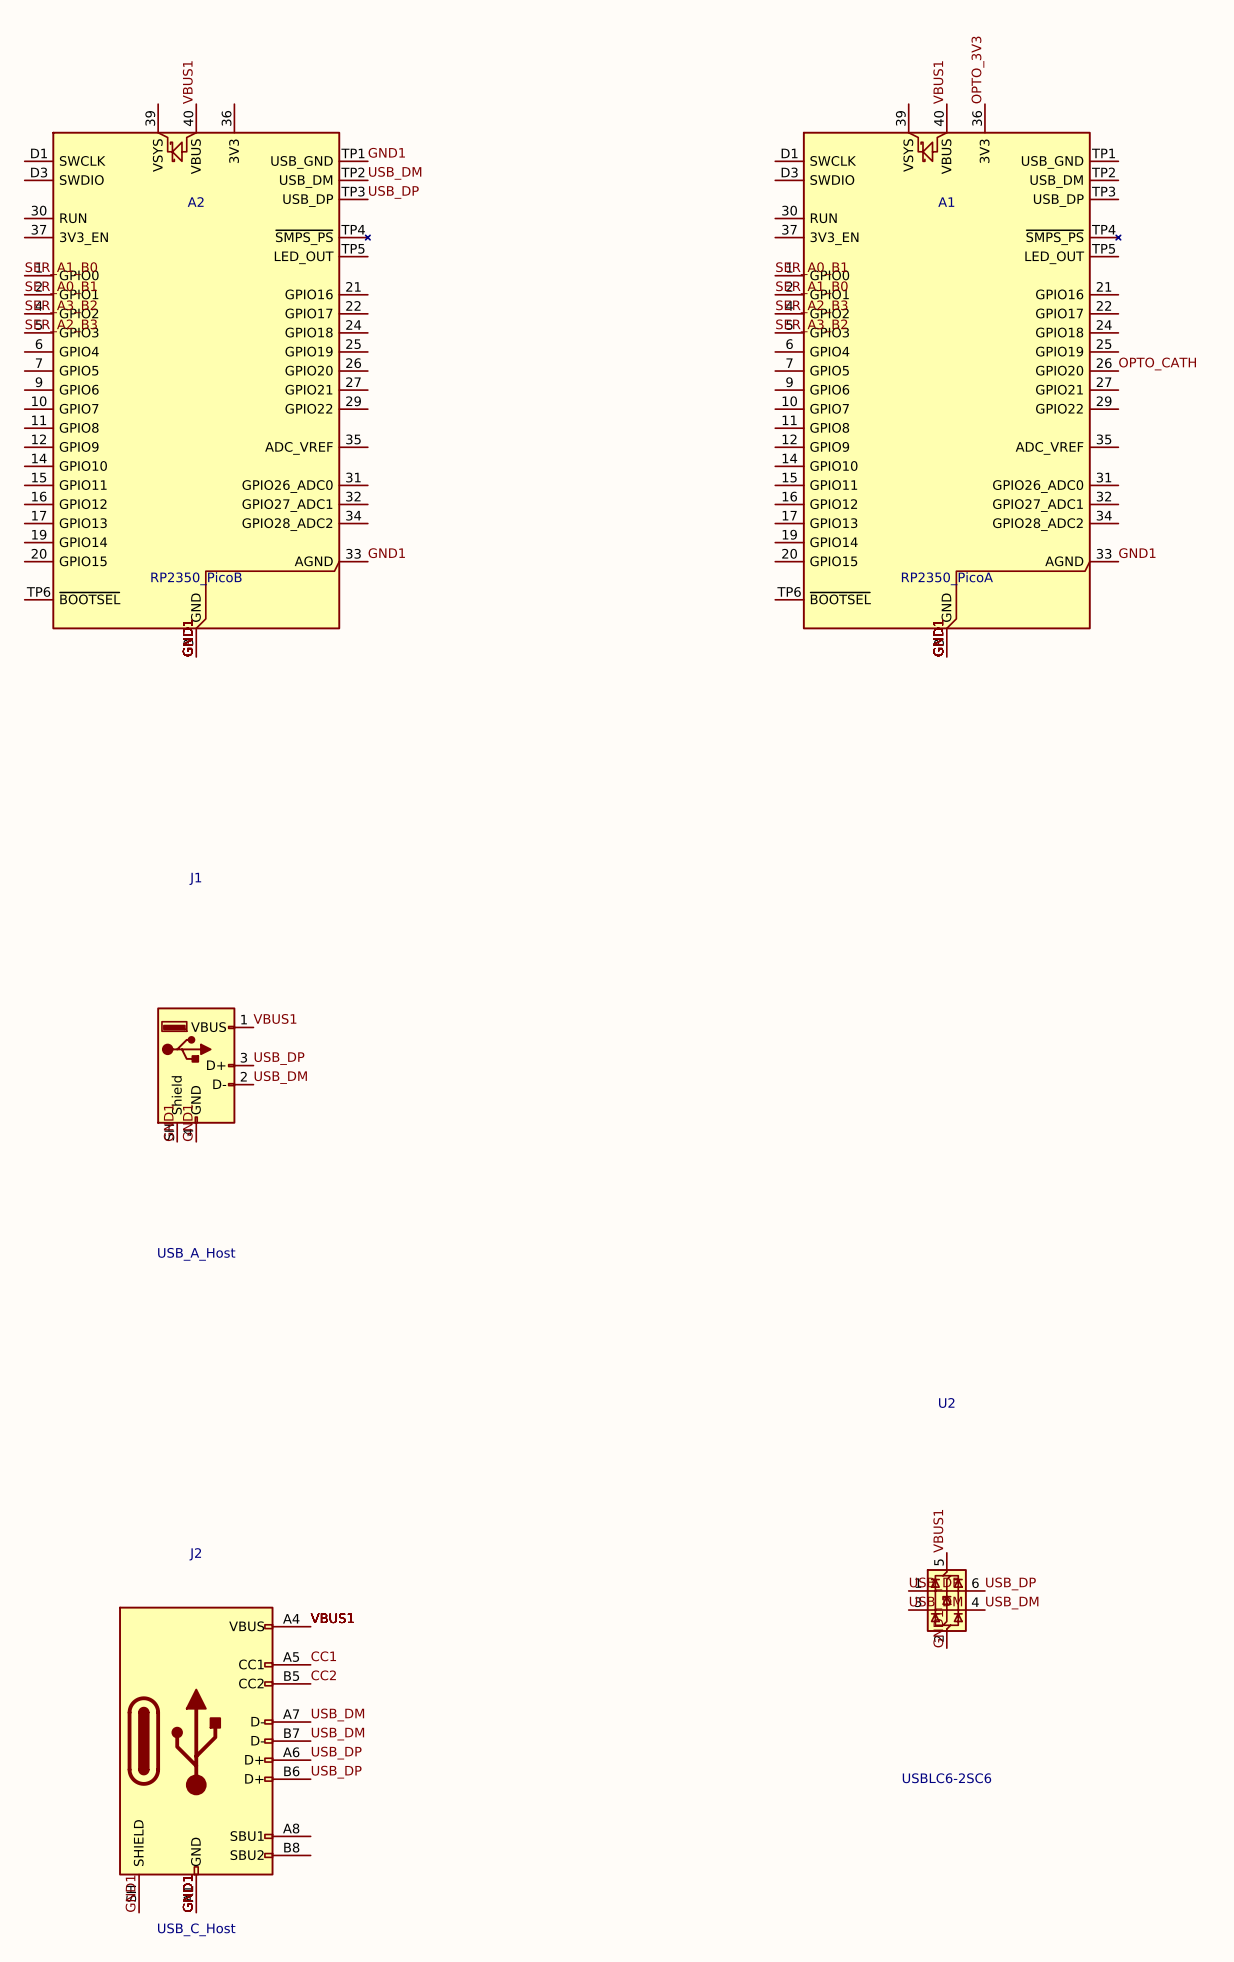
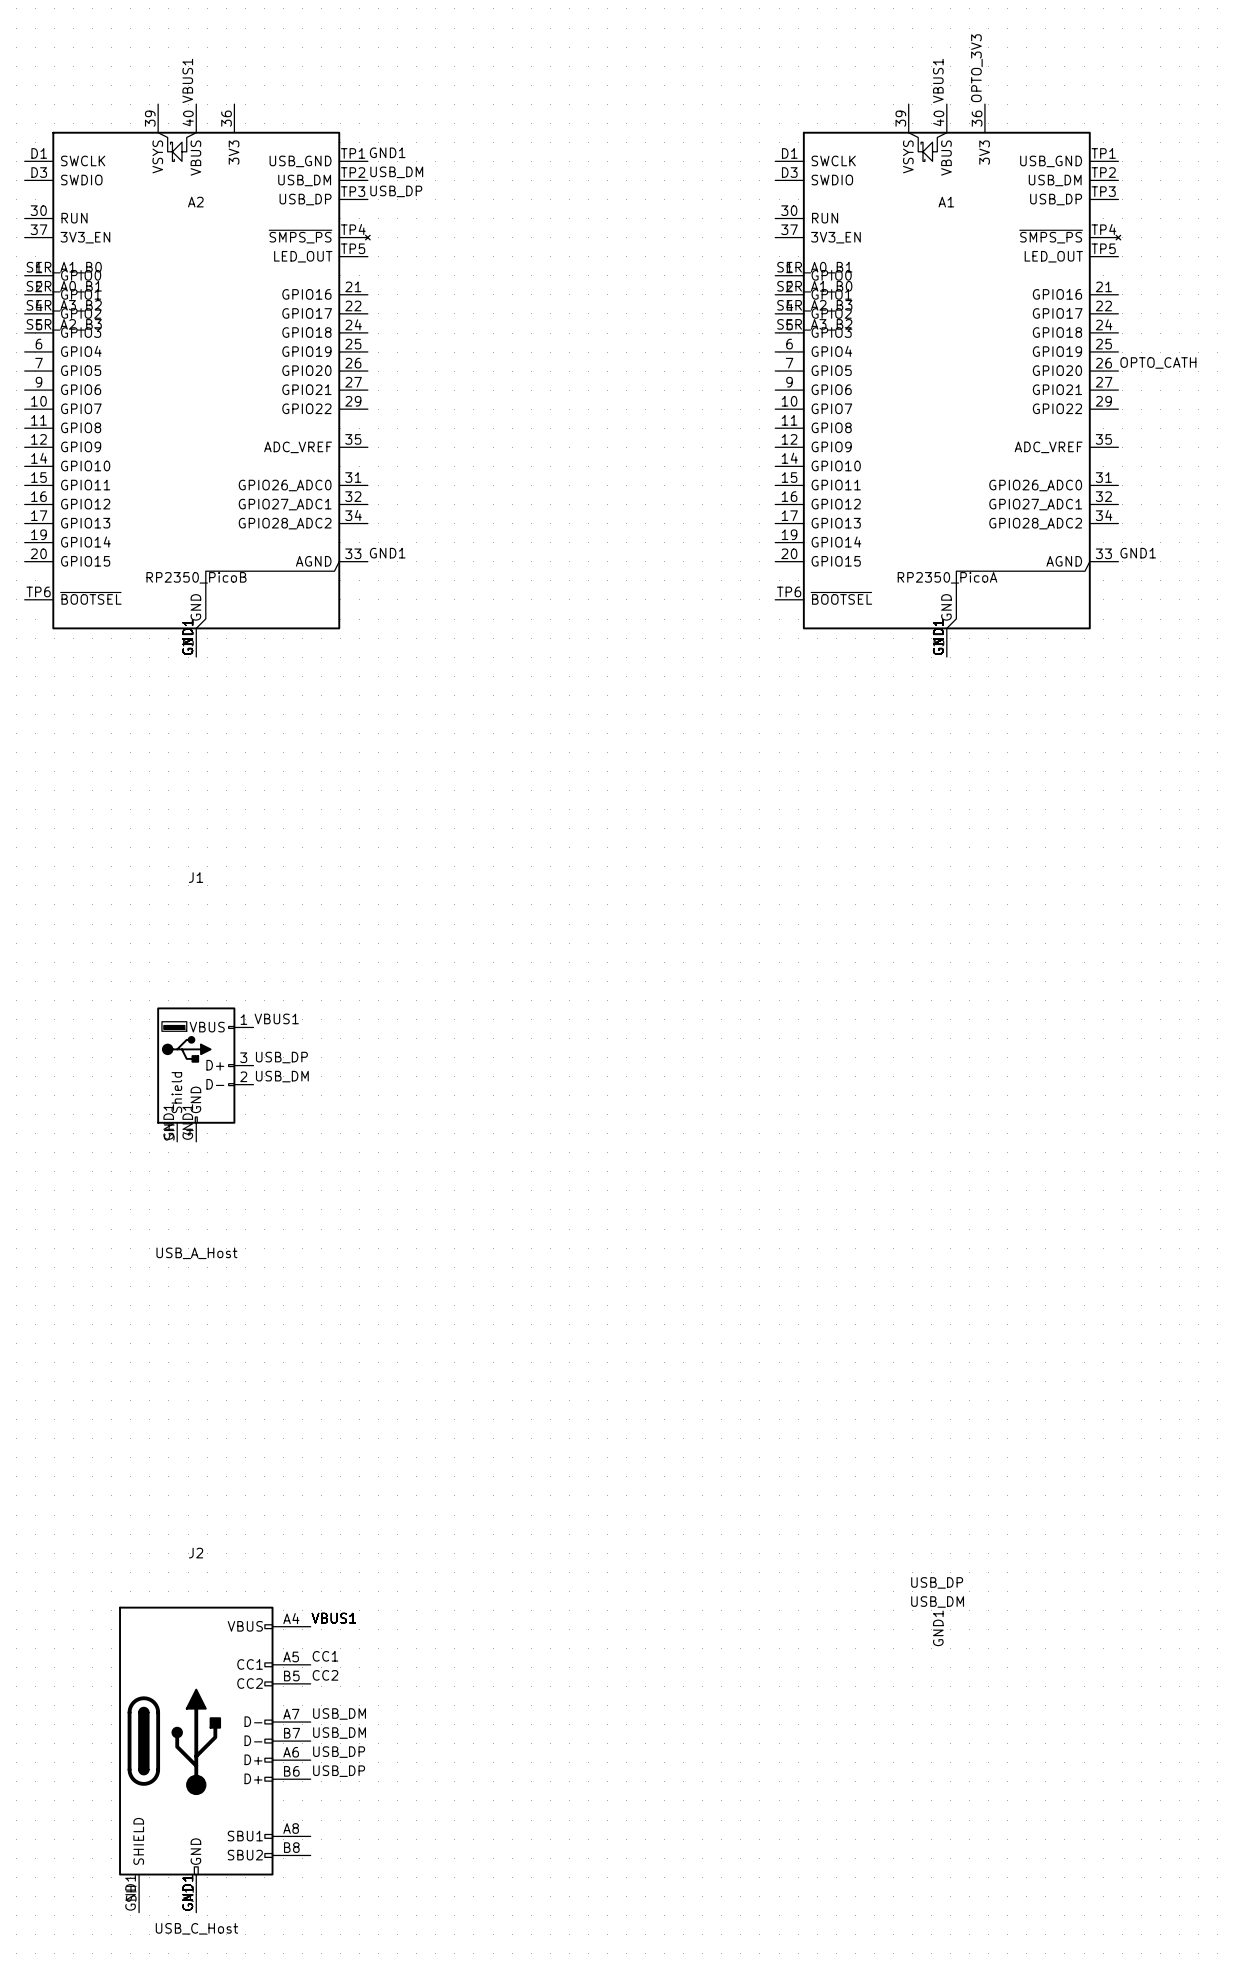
label: VBUS1 (938, 1531) -> none
label: USB_DP (1010, 1583) -> none
U2: USBLC6-2SC6 (946, 1600) -> none
label: USB_DM (1012, 1602) -> none

